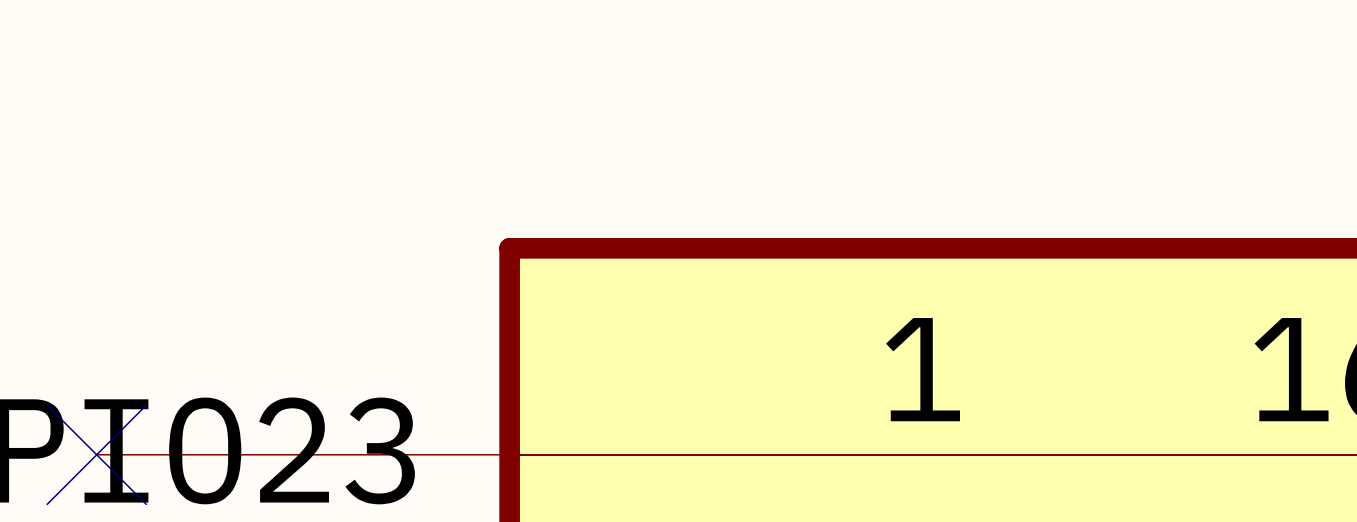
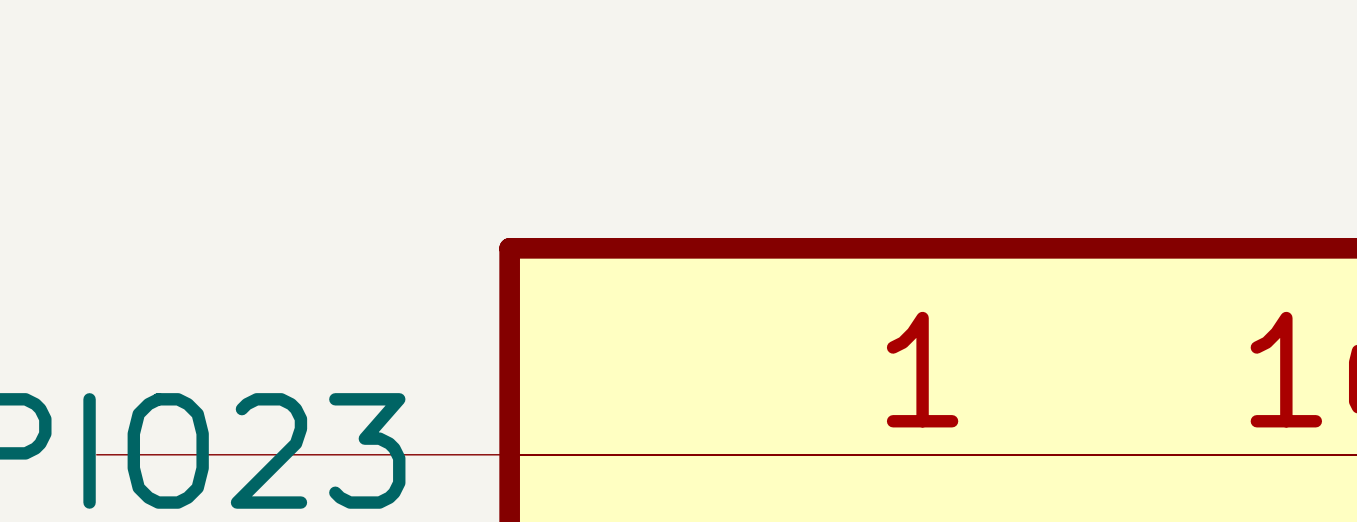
no-connect mark: (96, 454) -> none

